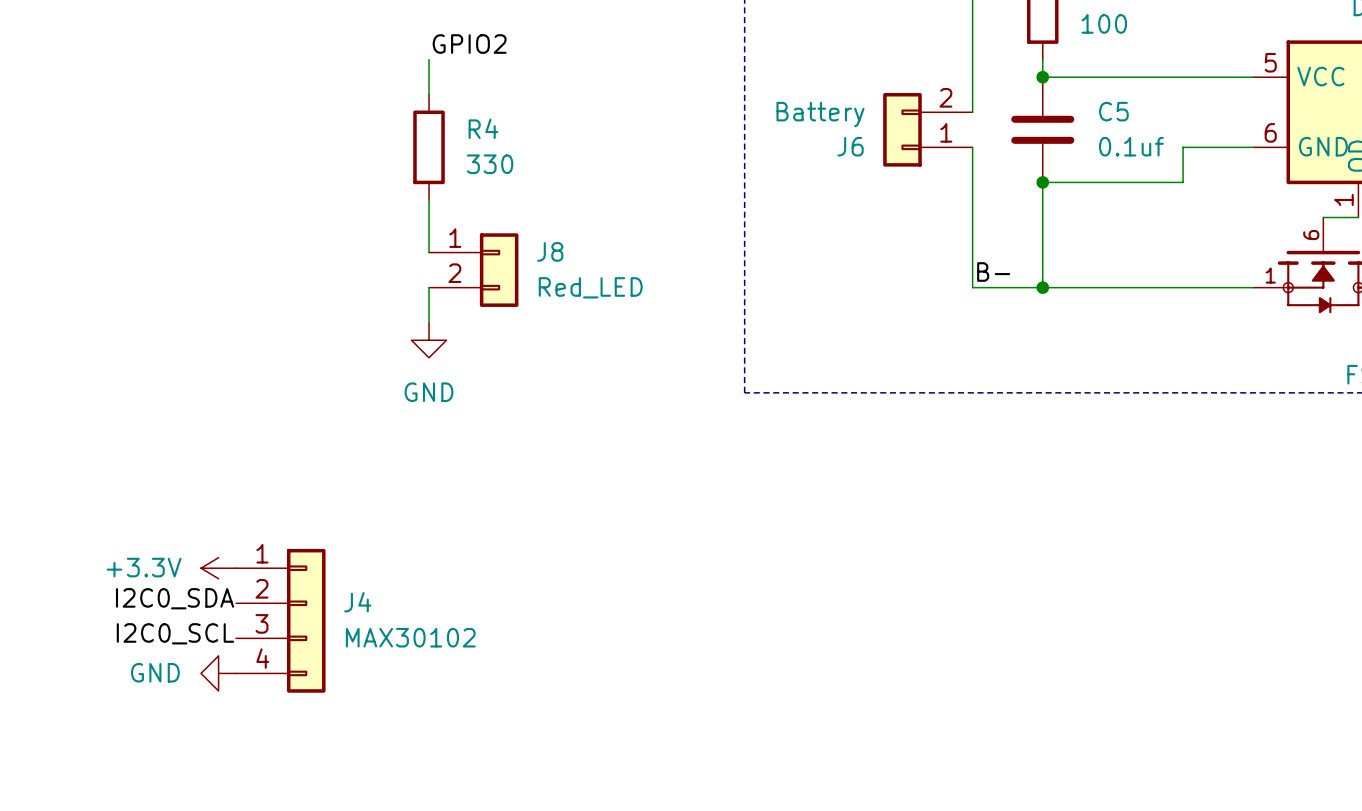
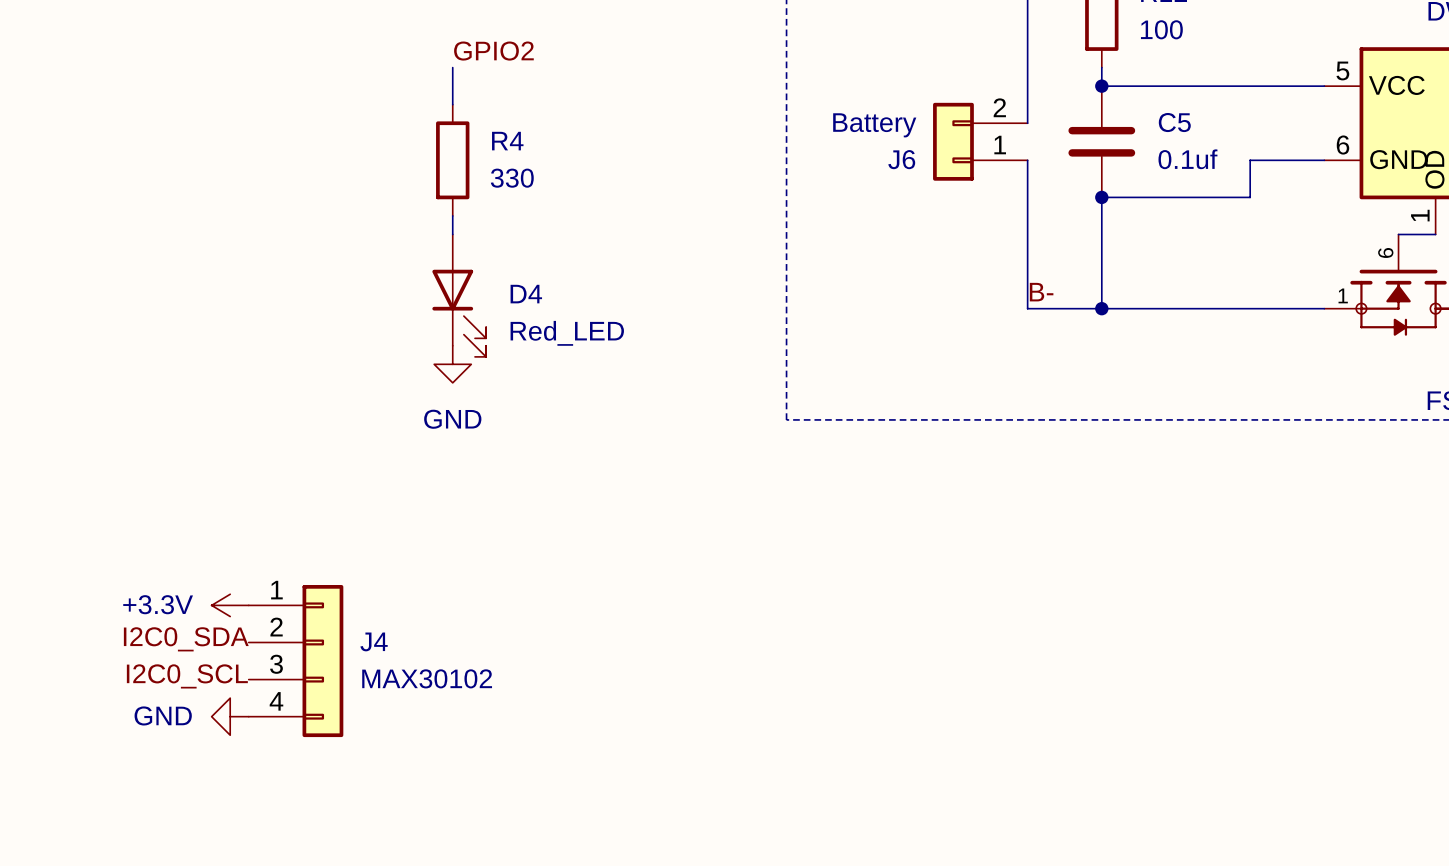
J8: Red_LED (473, 270) -> none
D4: none -> Red_LED (459, 295)

